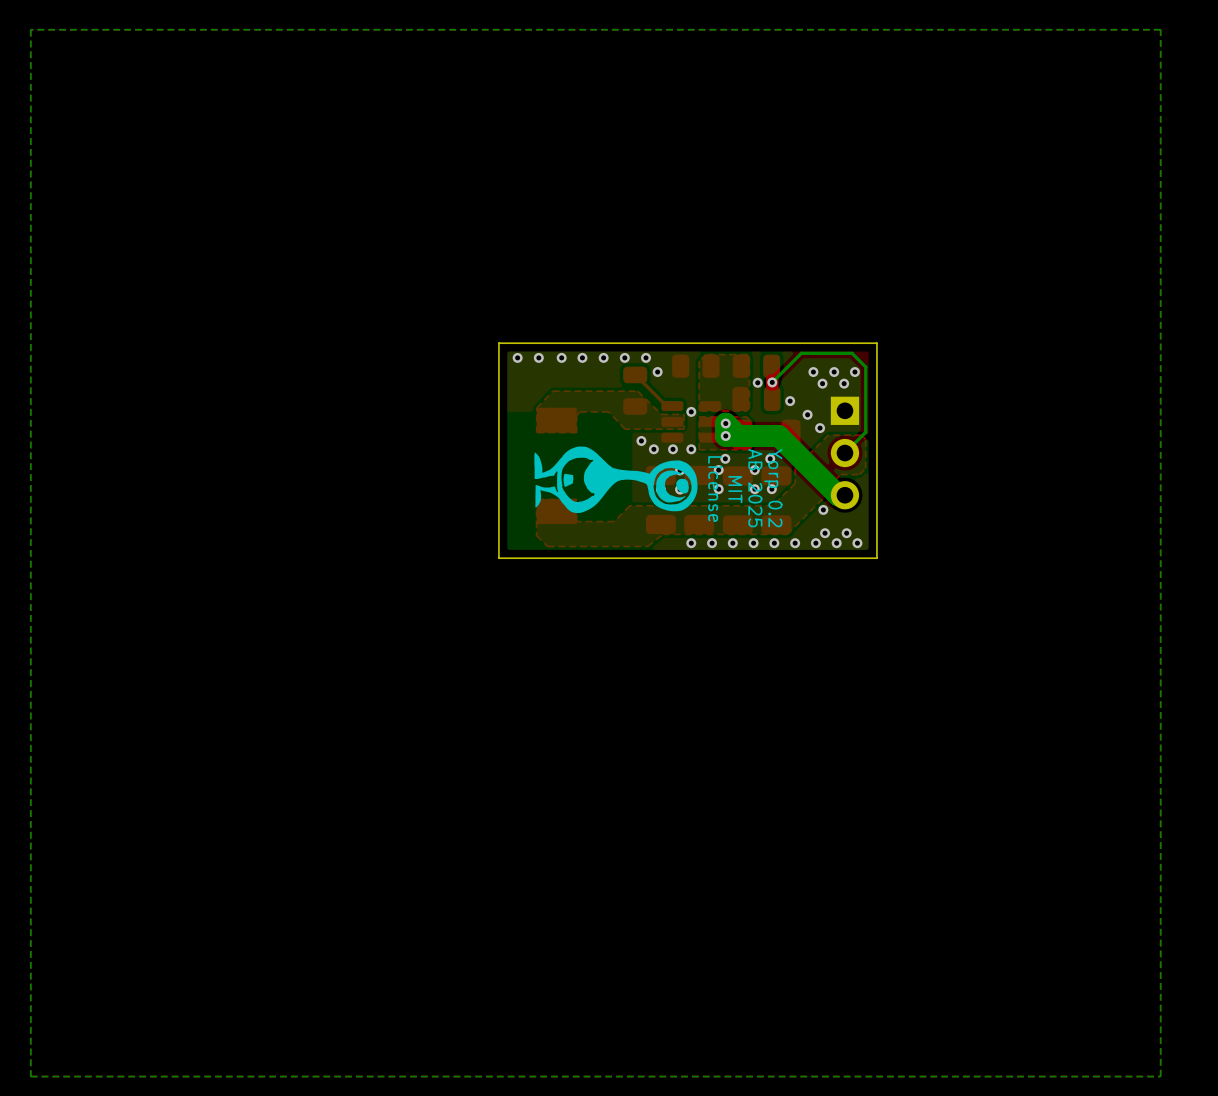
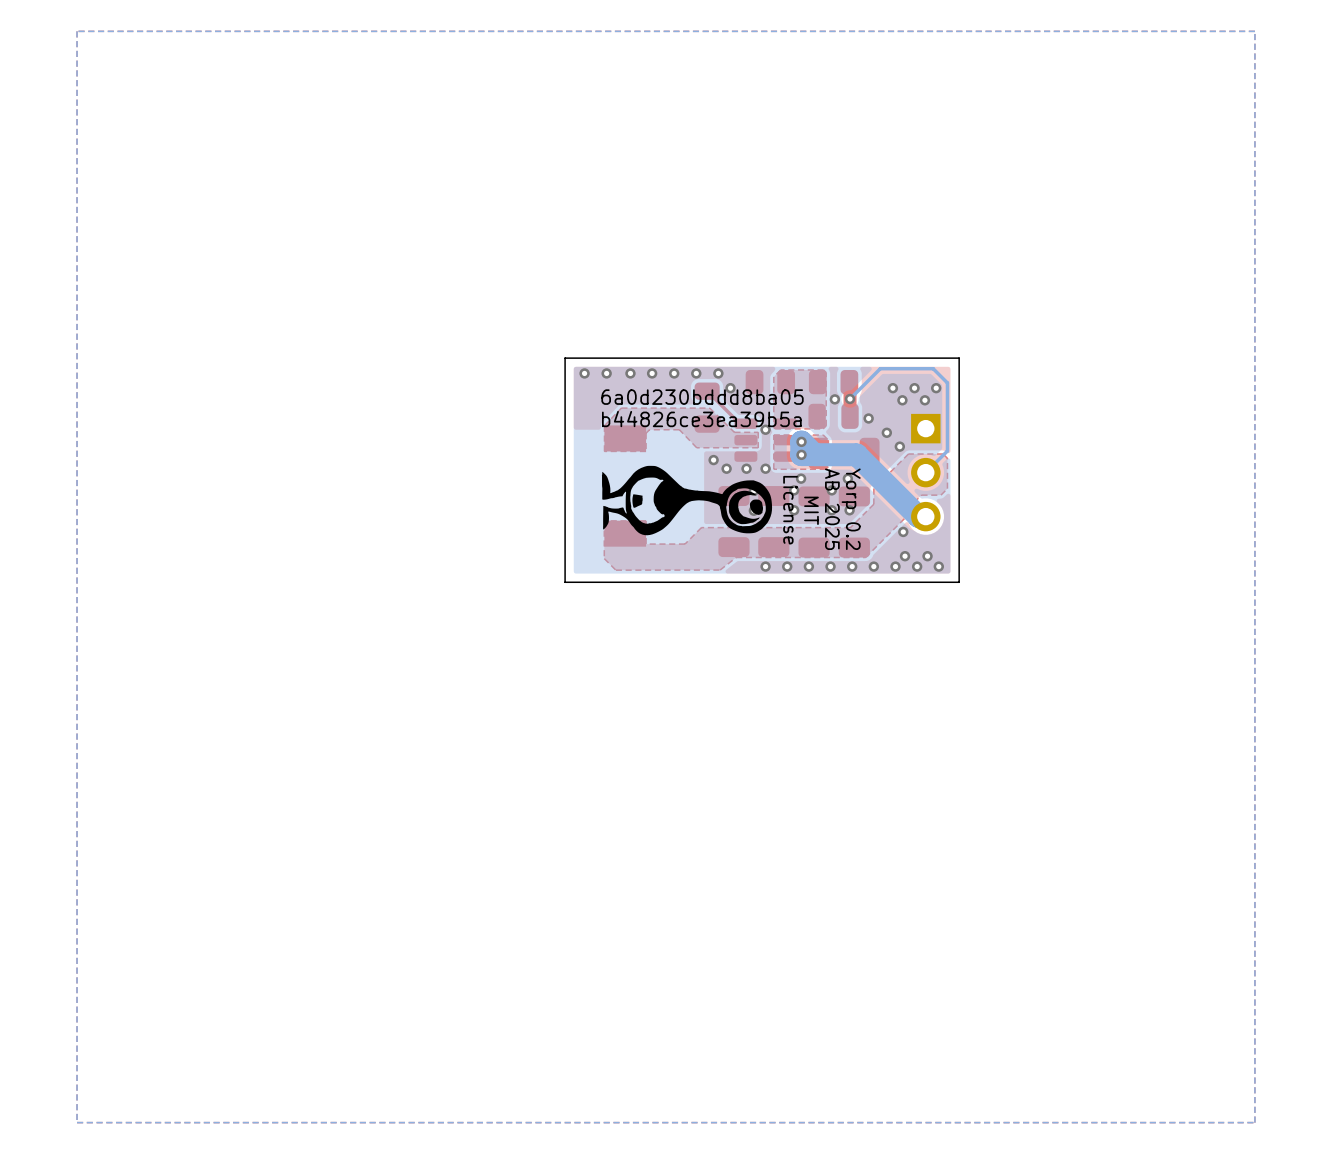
text: none -> 6a0d230bddd8ba05 (702, 397)
text: none -> b44826ce3ea39b5a (701, 419)

